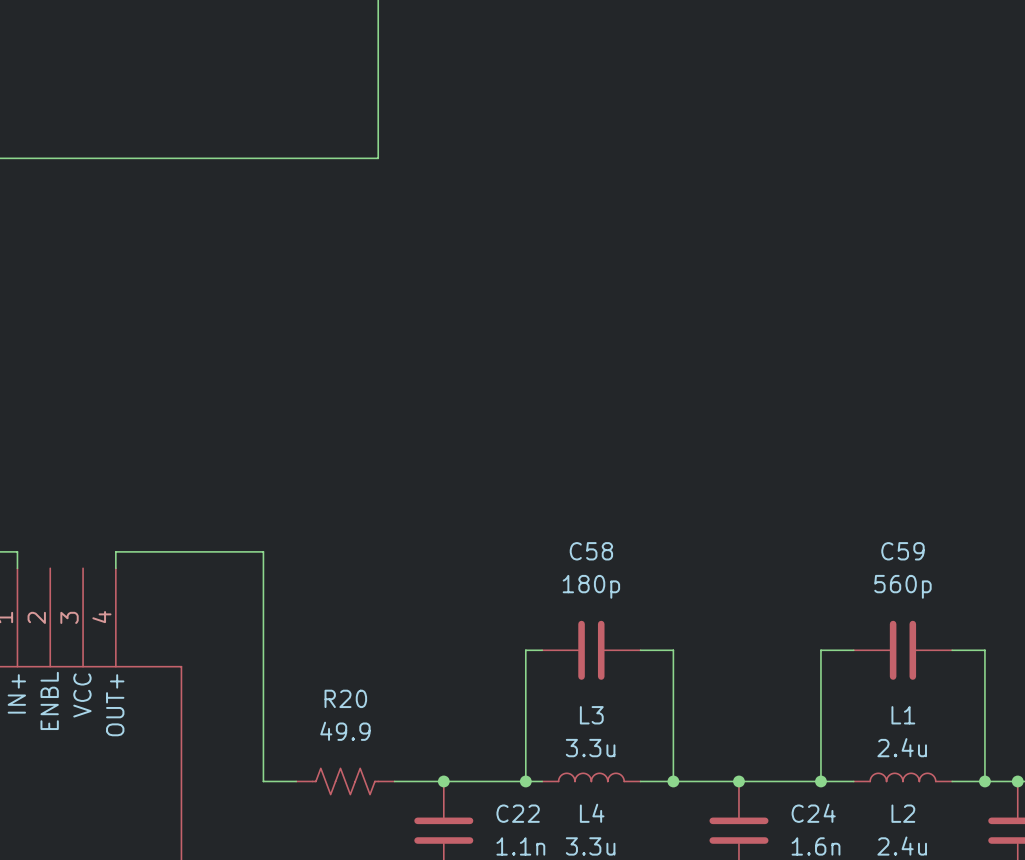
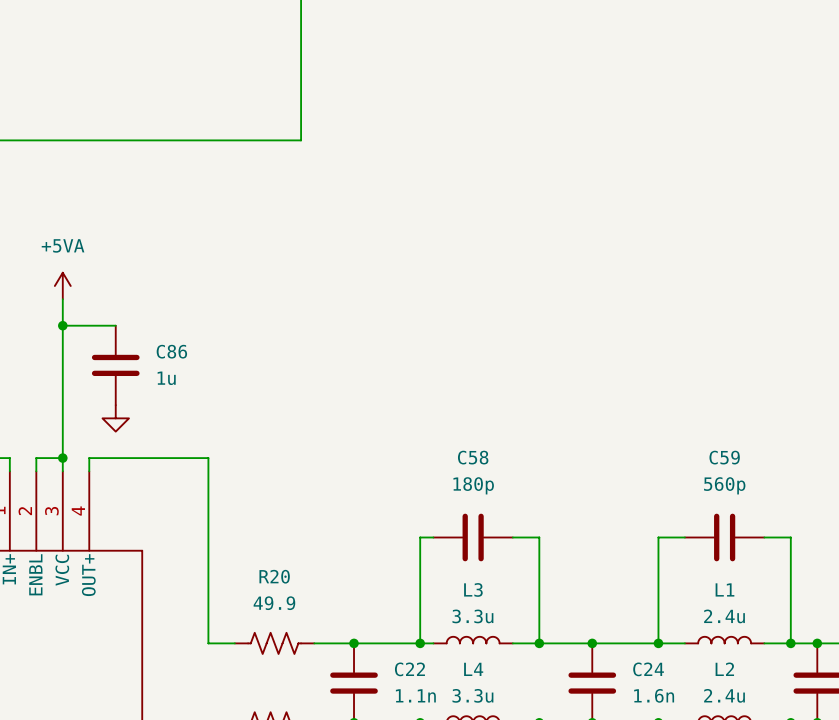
power symbol: none -> +5VA (62, 285)
wire: none -> (62, 299) (62, 471)
wire: none -> (62, 325) (115, 325)
junction: none -> (62, 325)
C86: none -> 1u (115, 365)
power symbol: none -> (115, 418)
wire: none -> (62, 458) (36, 458) (36, 471)
junction: none -> (62, 458)

